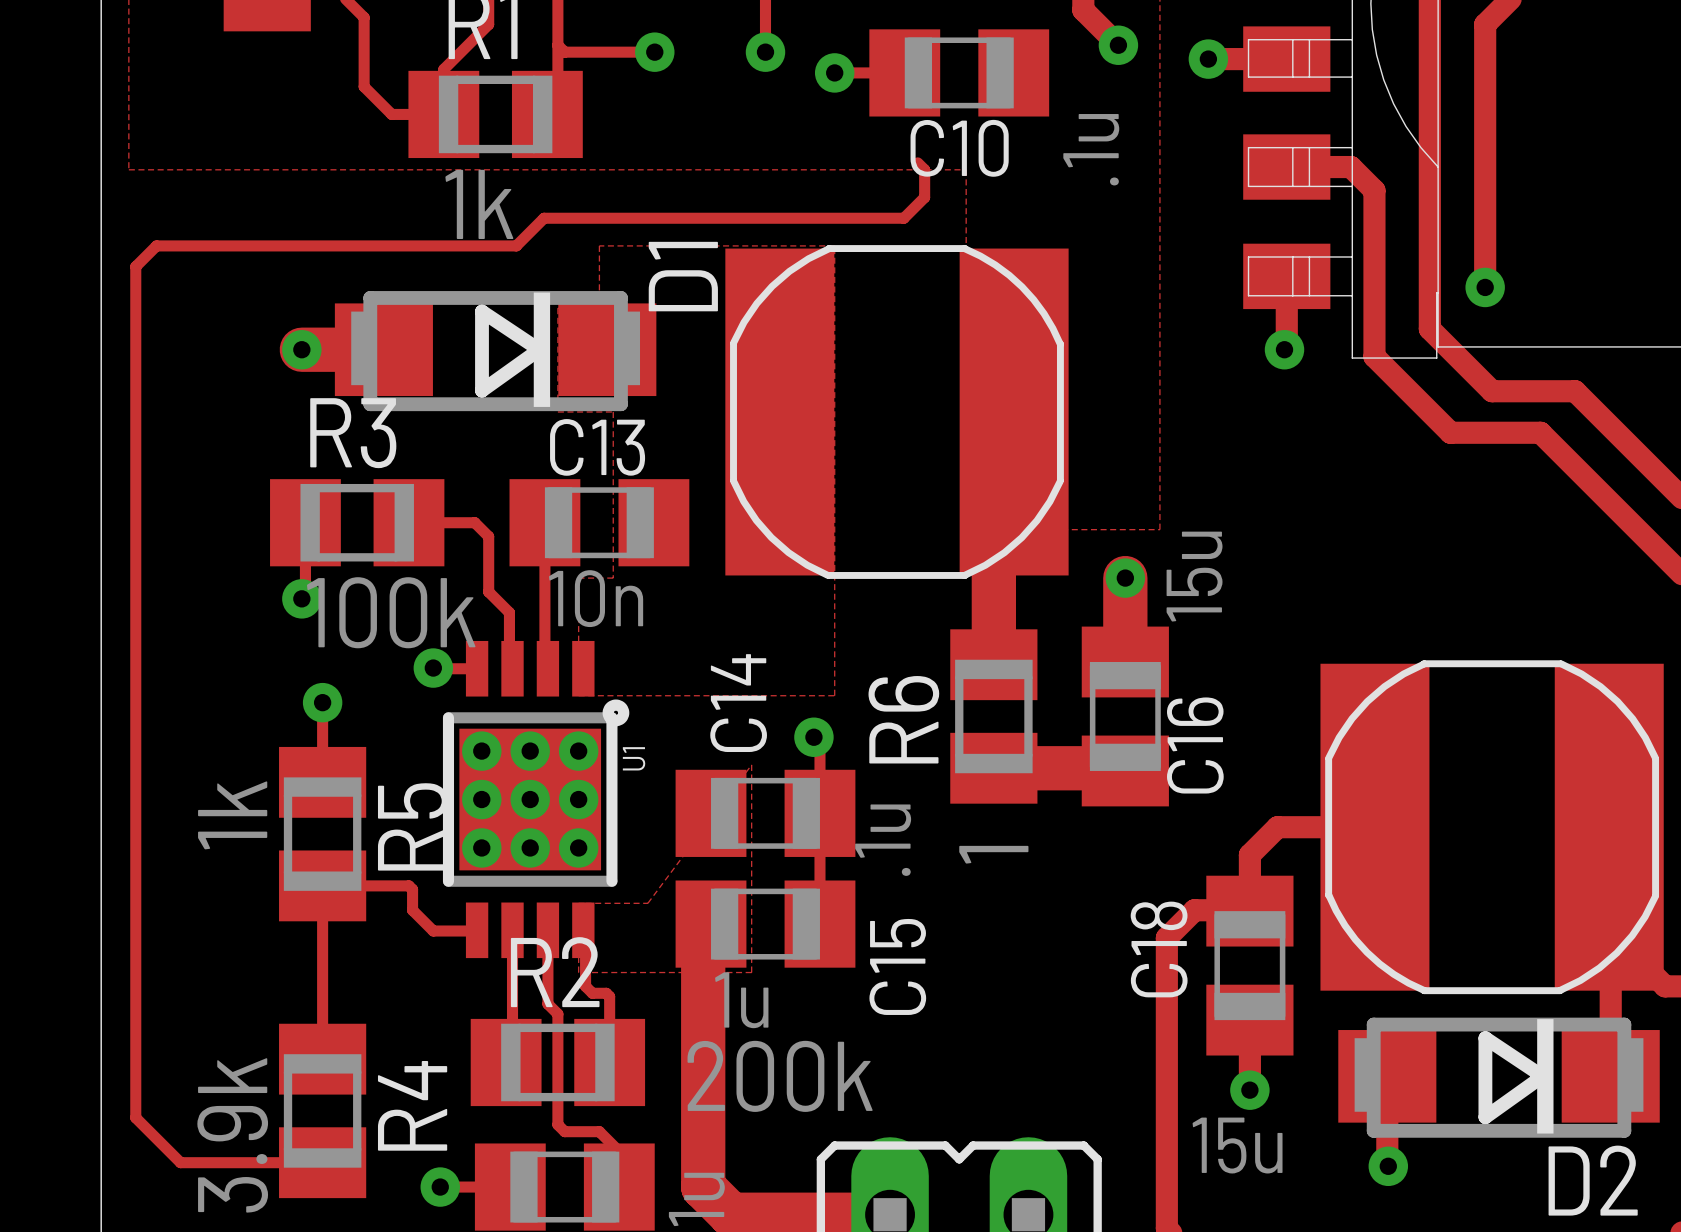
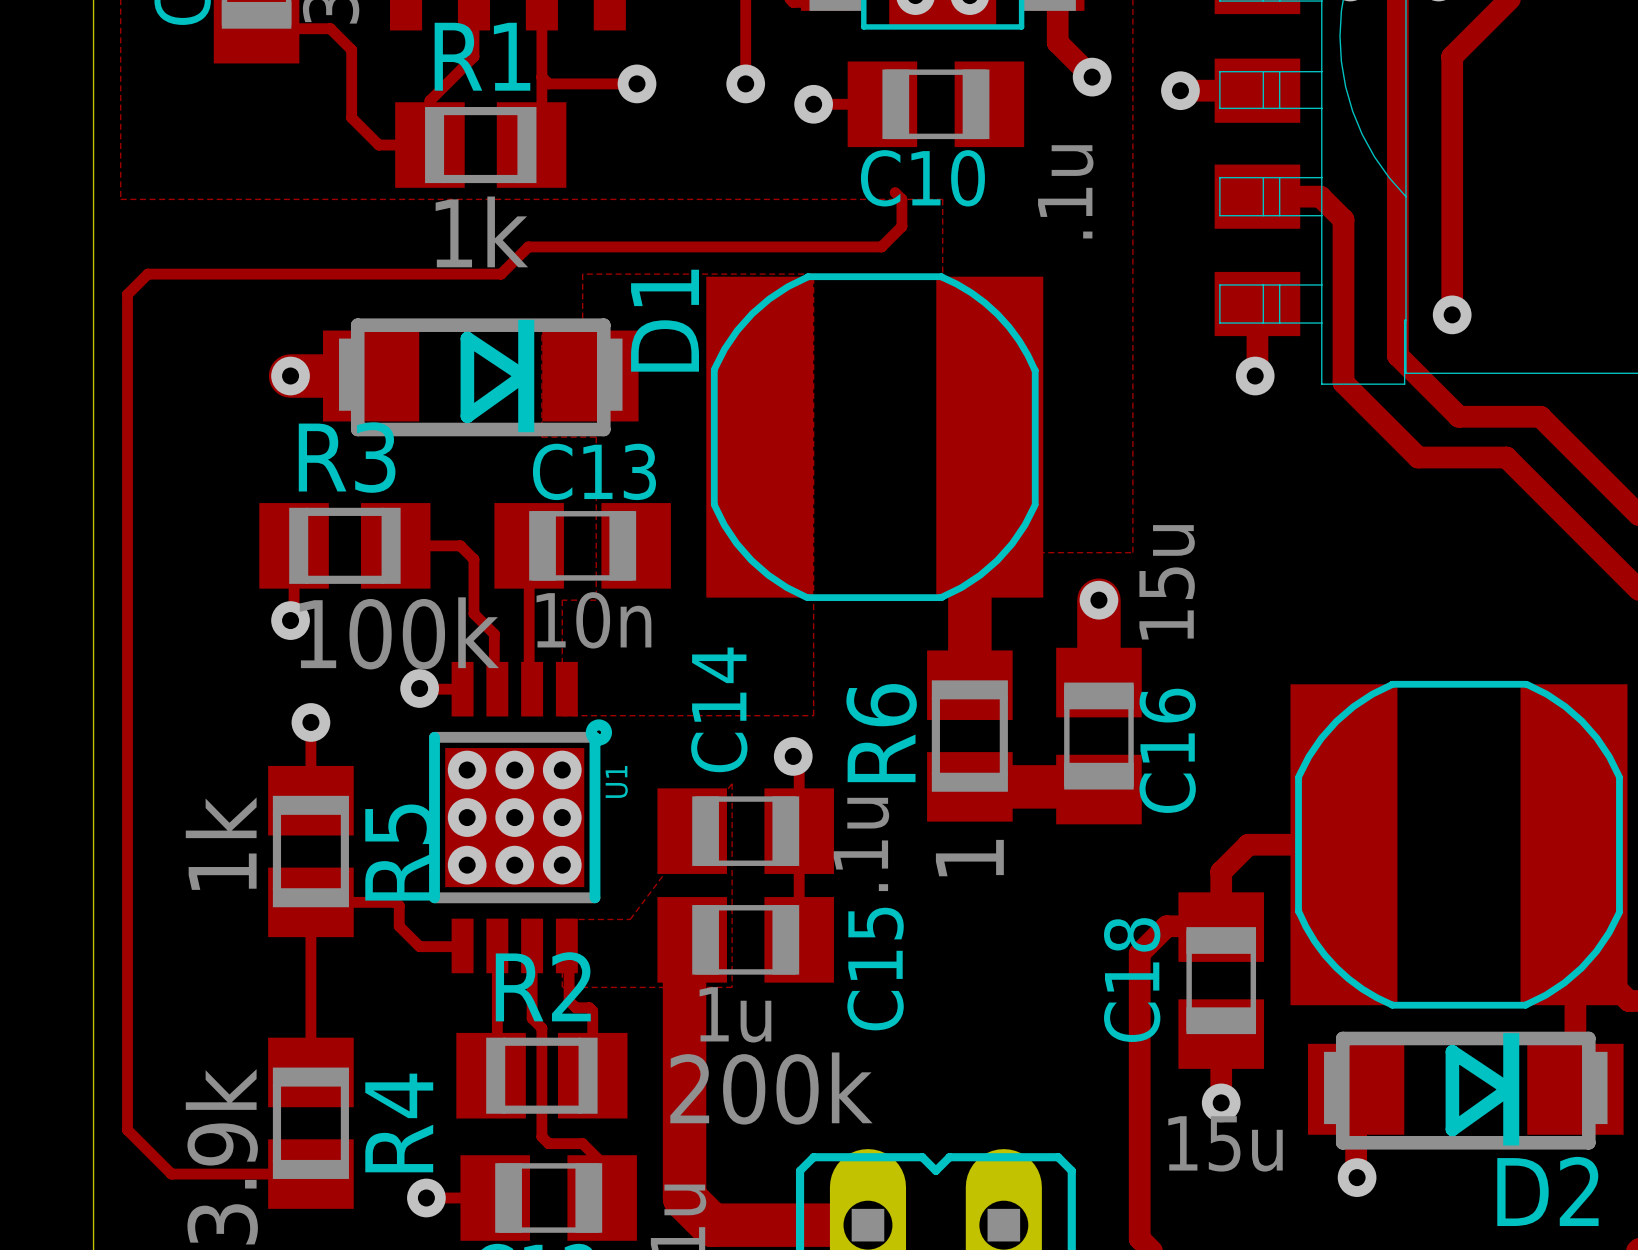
C18 value position: 15u (1237, 1145) -> 15u (1225, 1143)

